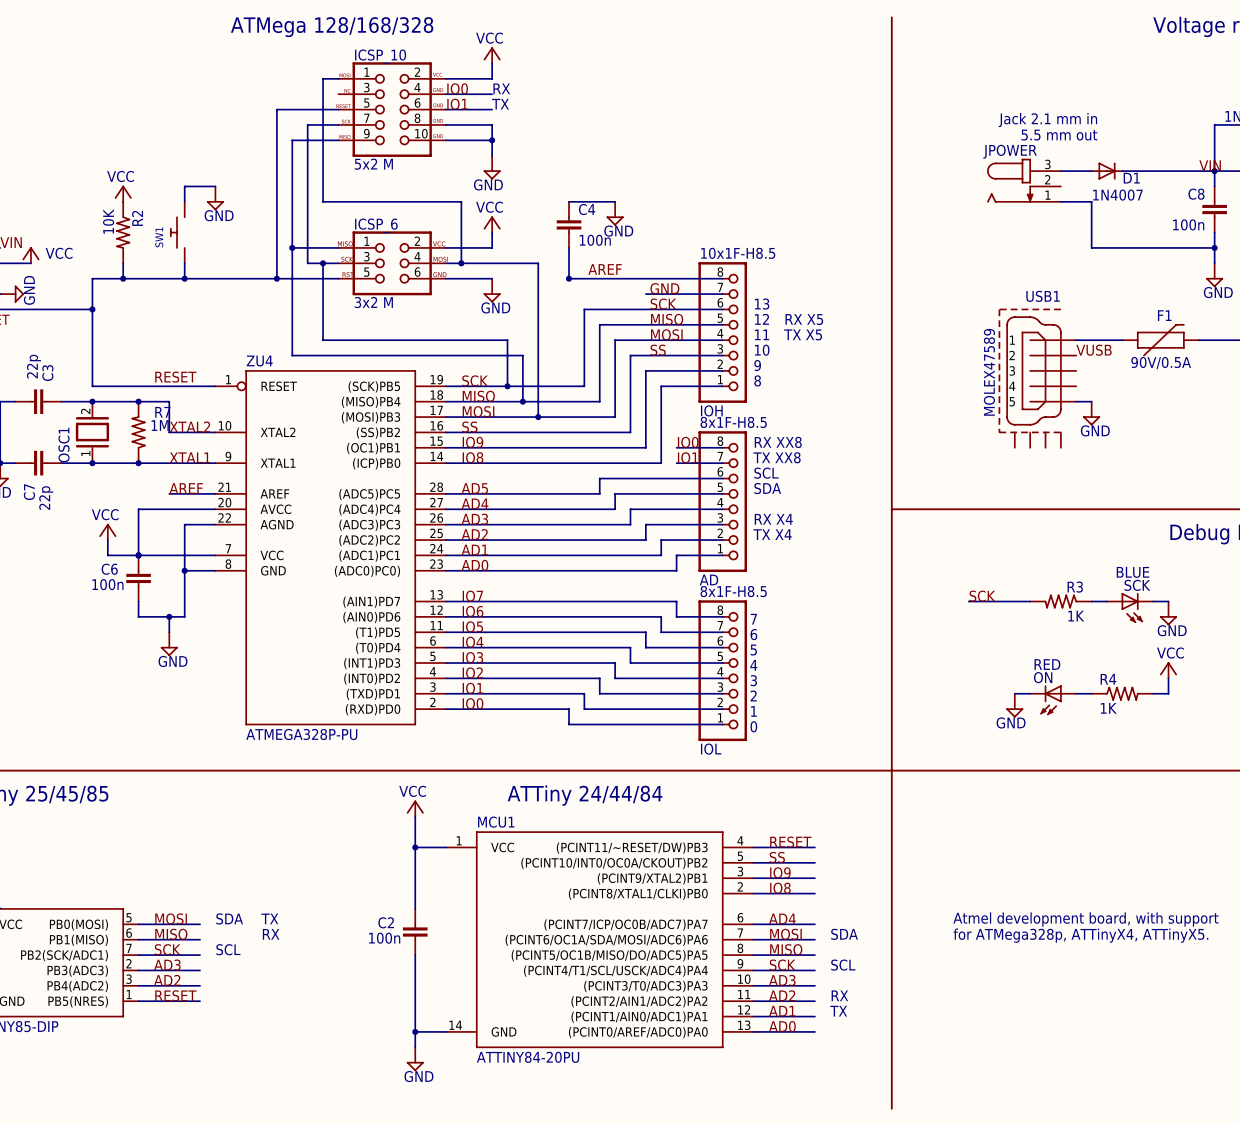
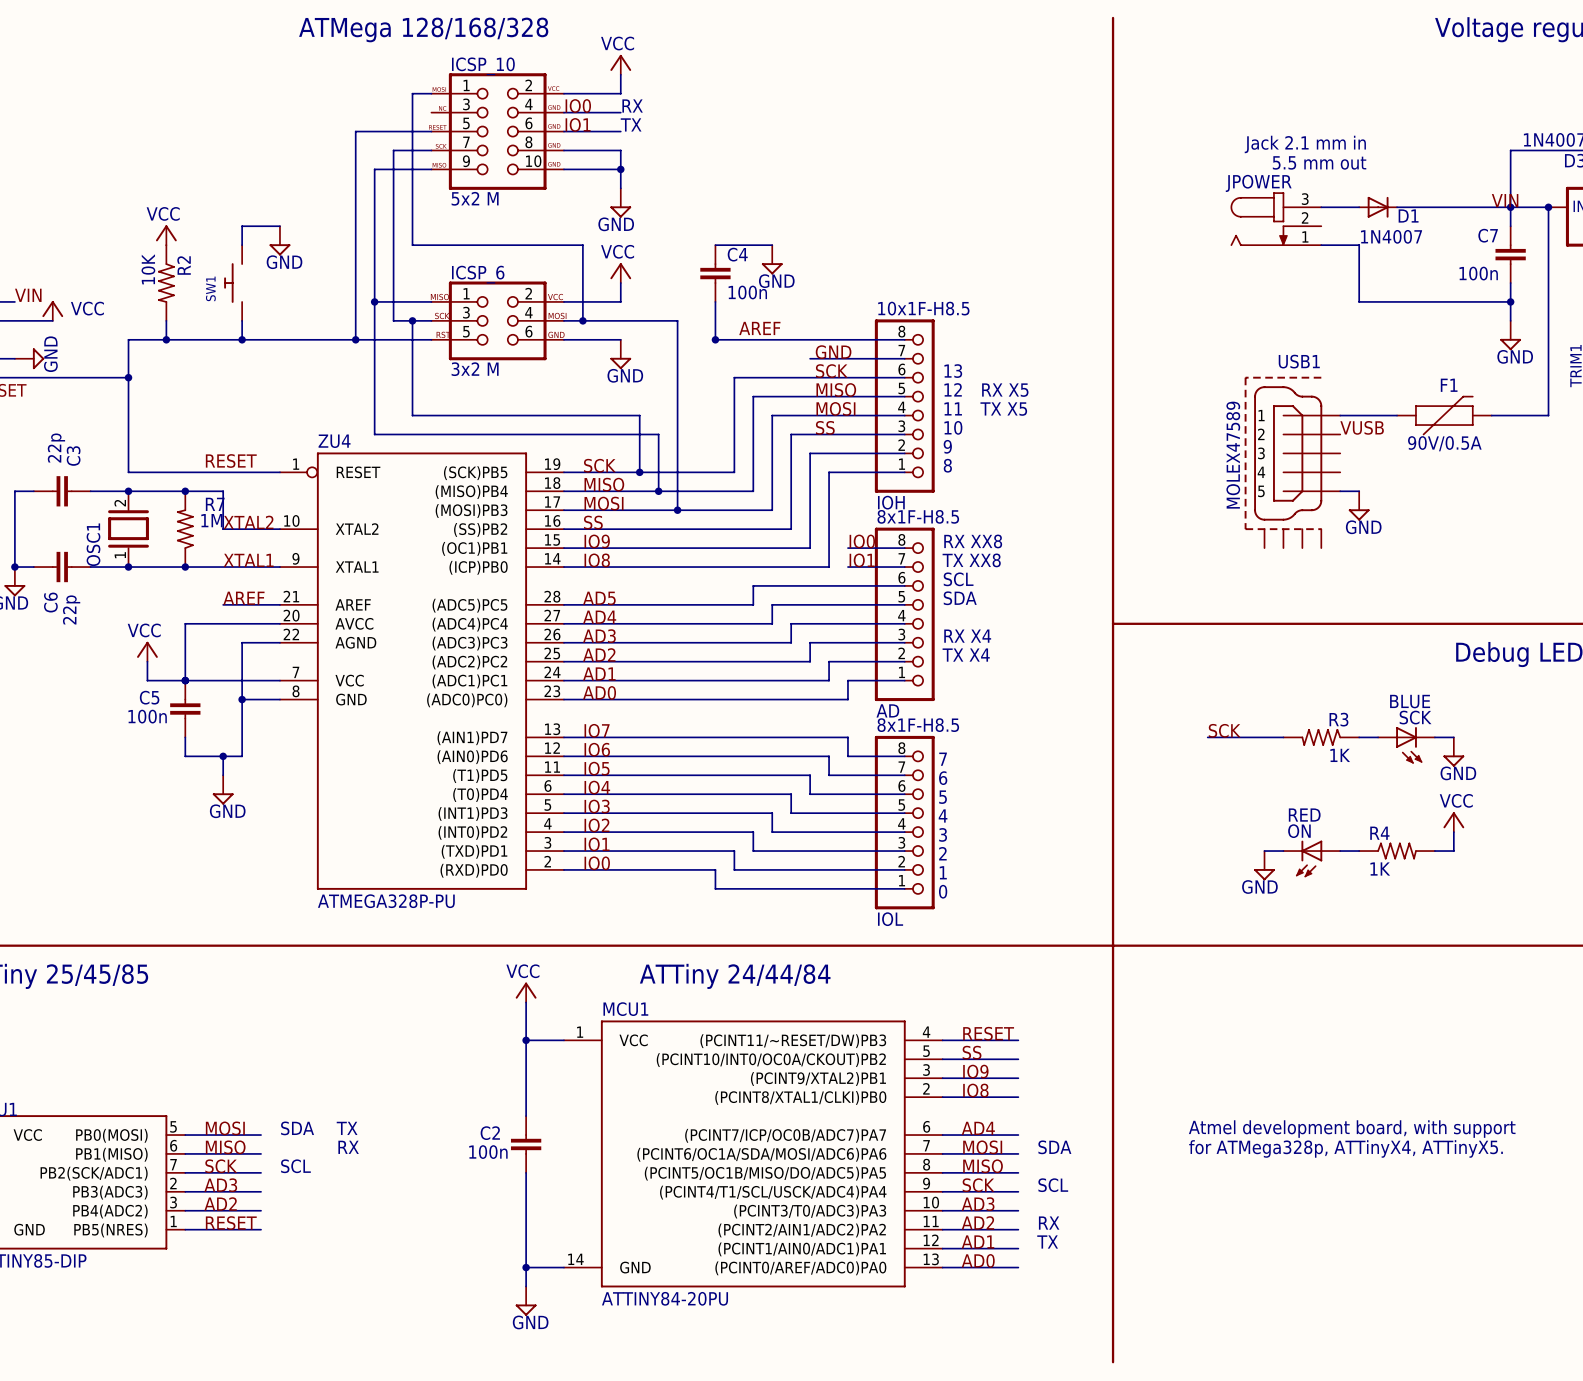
C8 name: C8 (1196, 194) -> C7 (1488, 235)
C7 name: C7 (29, 492) -> C6 (50, 602)
C6 name: C6 (109, 569) -> C5 (149, 697)

